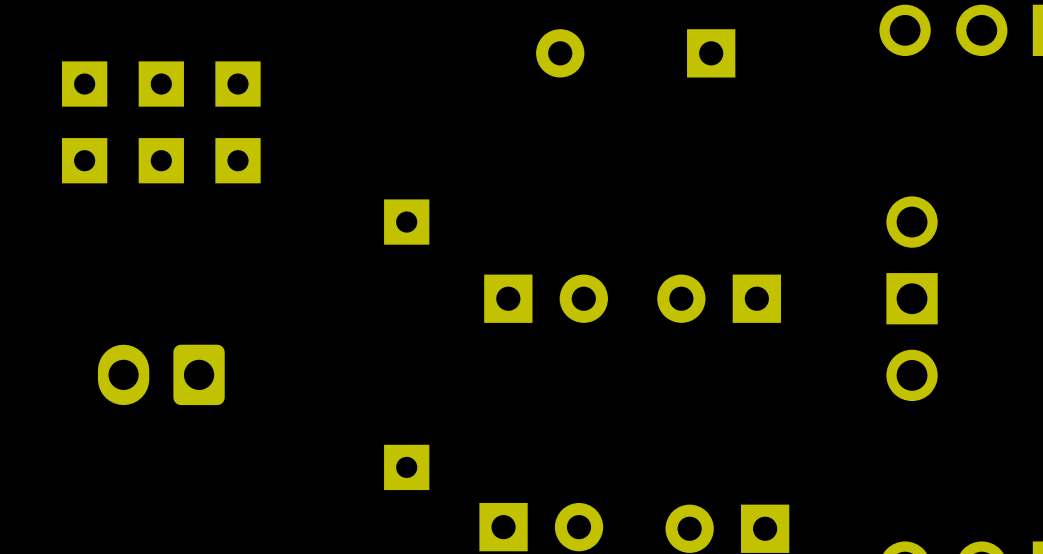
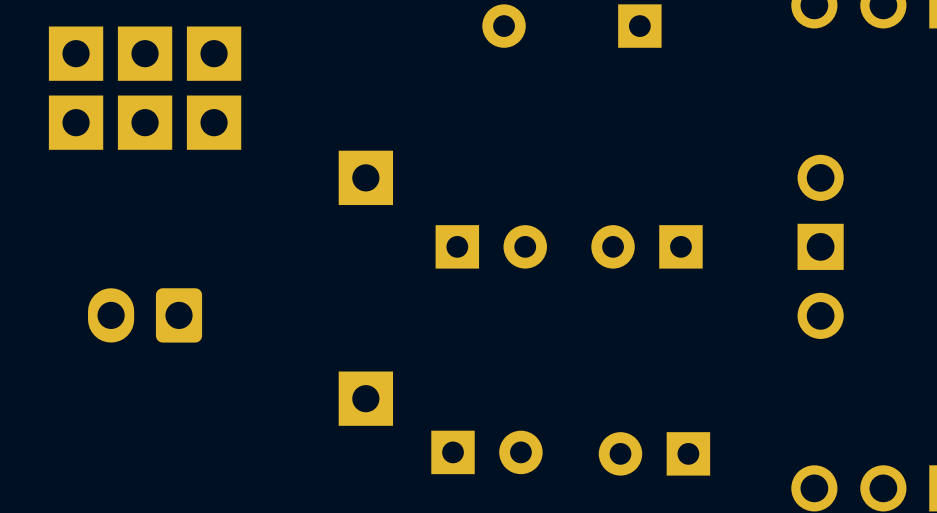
part footprint: [62, 61, 108, 107] -> [48, 26, 104, 81]
part footprint: [138, 61, 184, 107] -> [117, 26, 173, 81]
part footprint: [215, 61, 261, 107] -> [186, 26, 242, 81]
part footprint: [62, 138, 108, 184] -> [48, 95, 104, 150]
part footprint: [138, 138, 184, 184] -> [117, 95, 173, 150]
part footprint: [215, 138, 261, 184] -> [186, 95, 242, 150]
part footprint: [384, 199, 430, 245] -> [338, 150, 394, 206]
part footprint: [384, 444, 430, 491] -> [338, 371, 394, 426]

